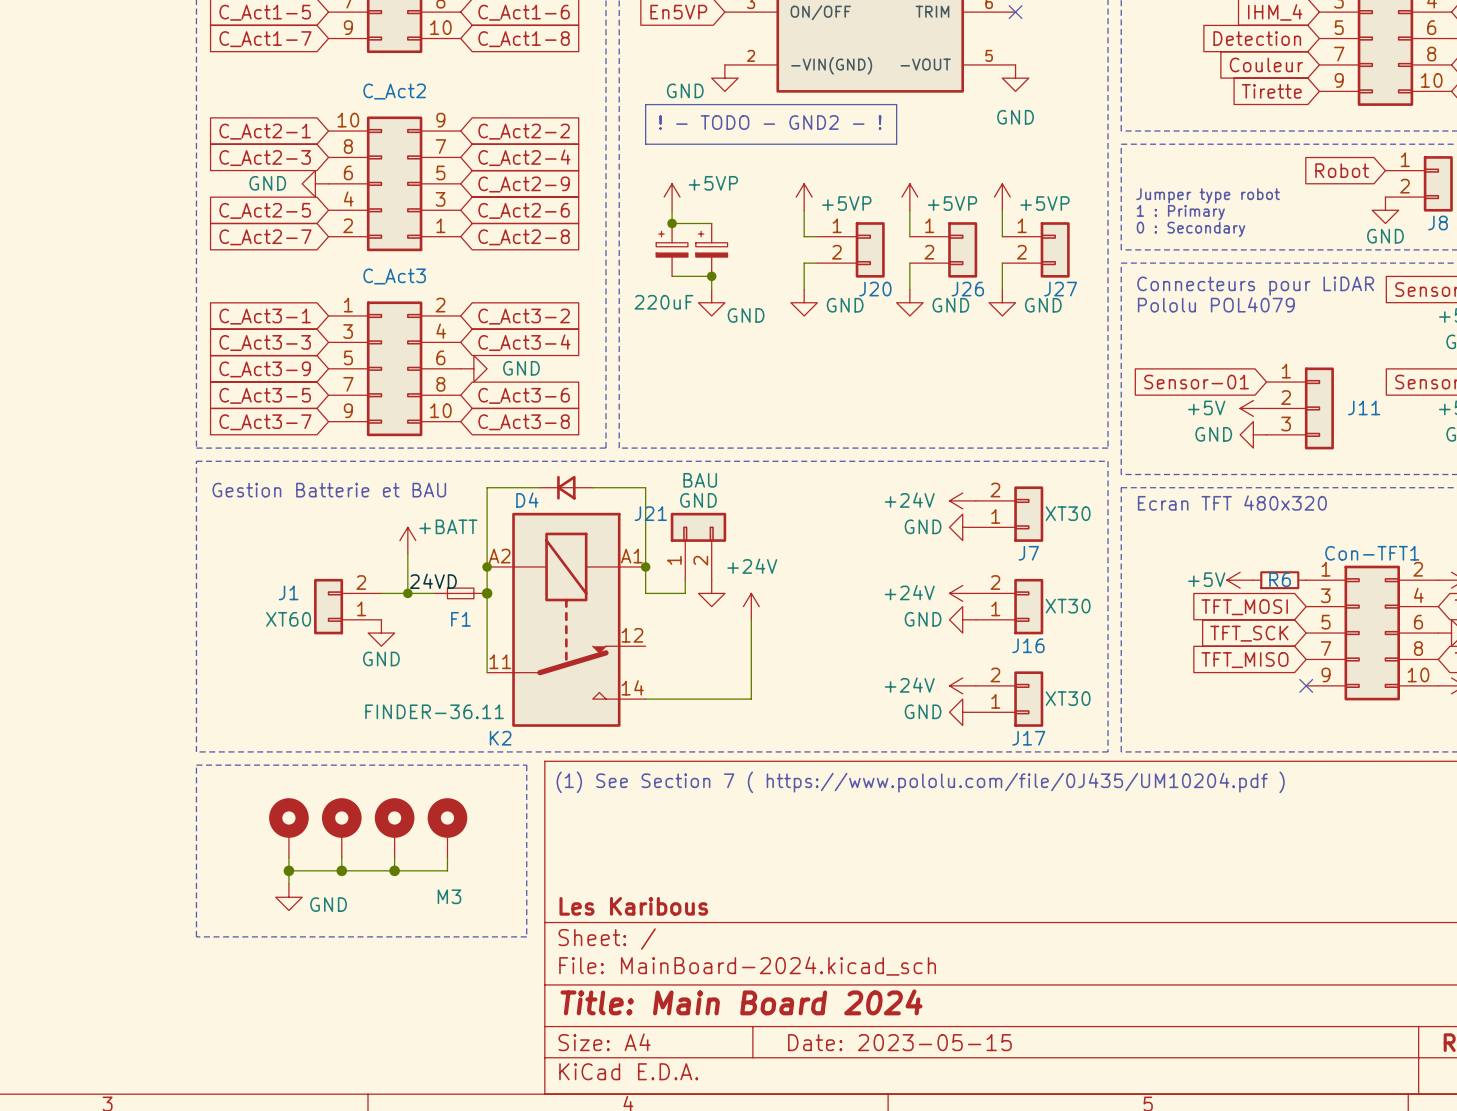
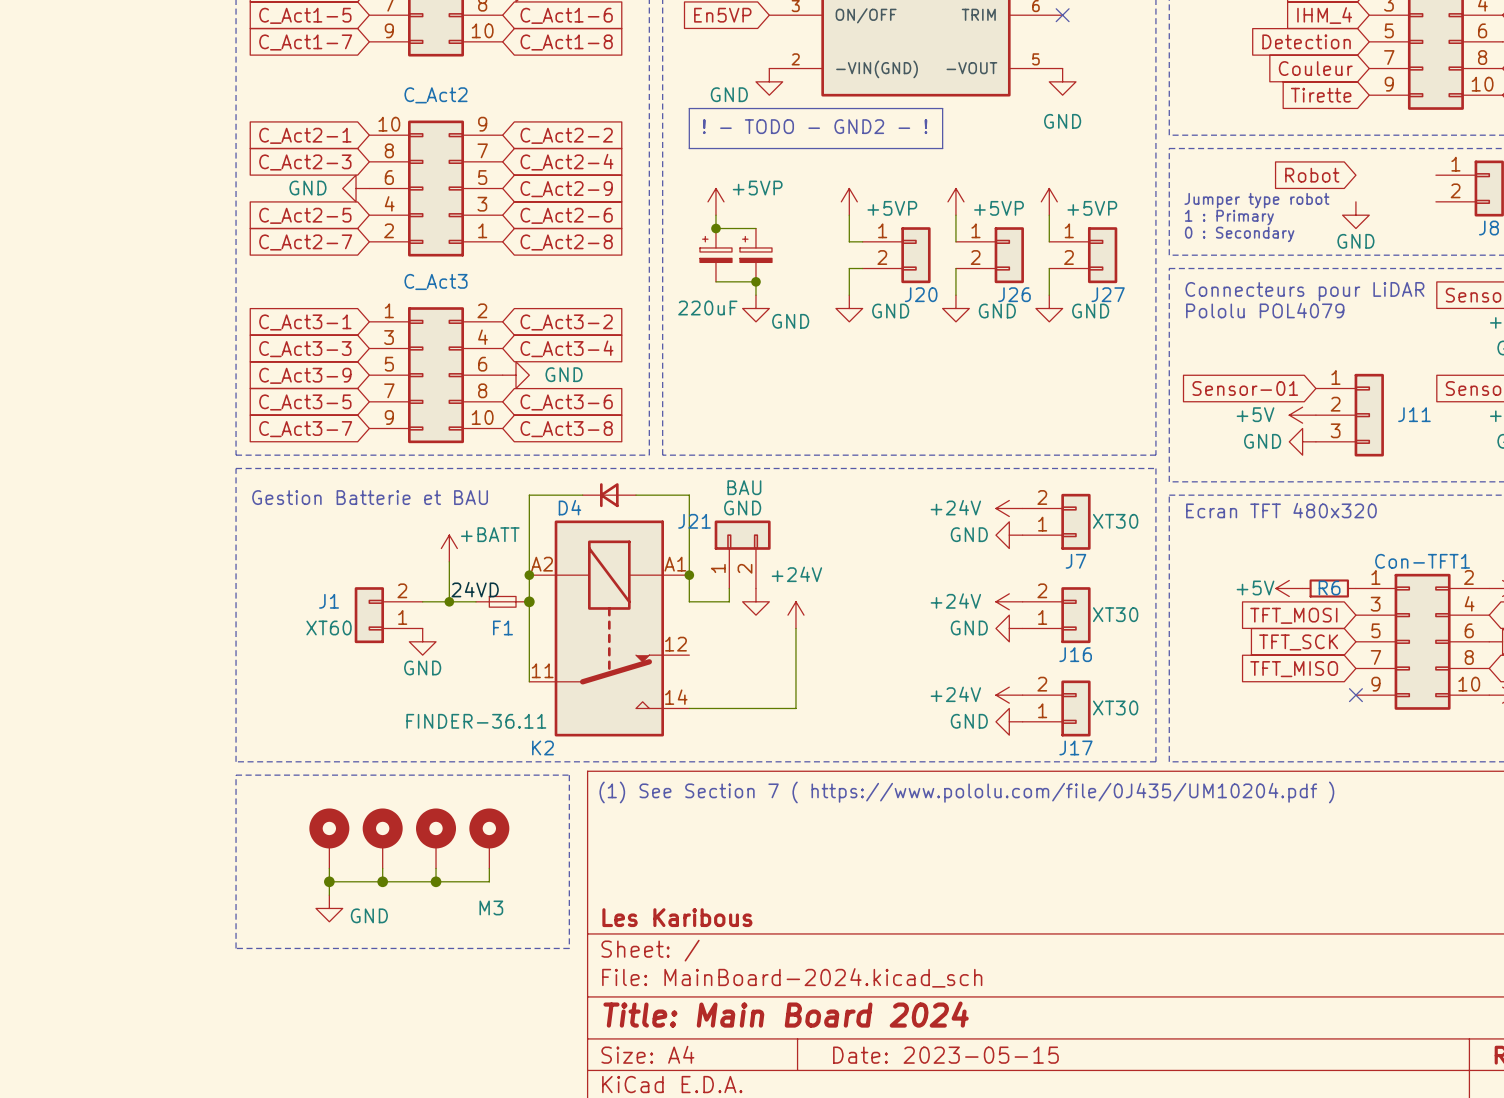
global label position: Robot (1342, 170) -> Robot (1312, 175)
power symbol: none -> GND (1355, 215)
power symbol: GND (1385, 210) -> none

